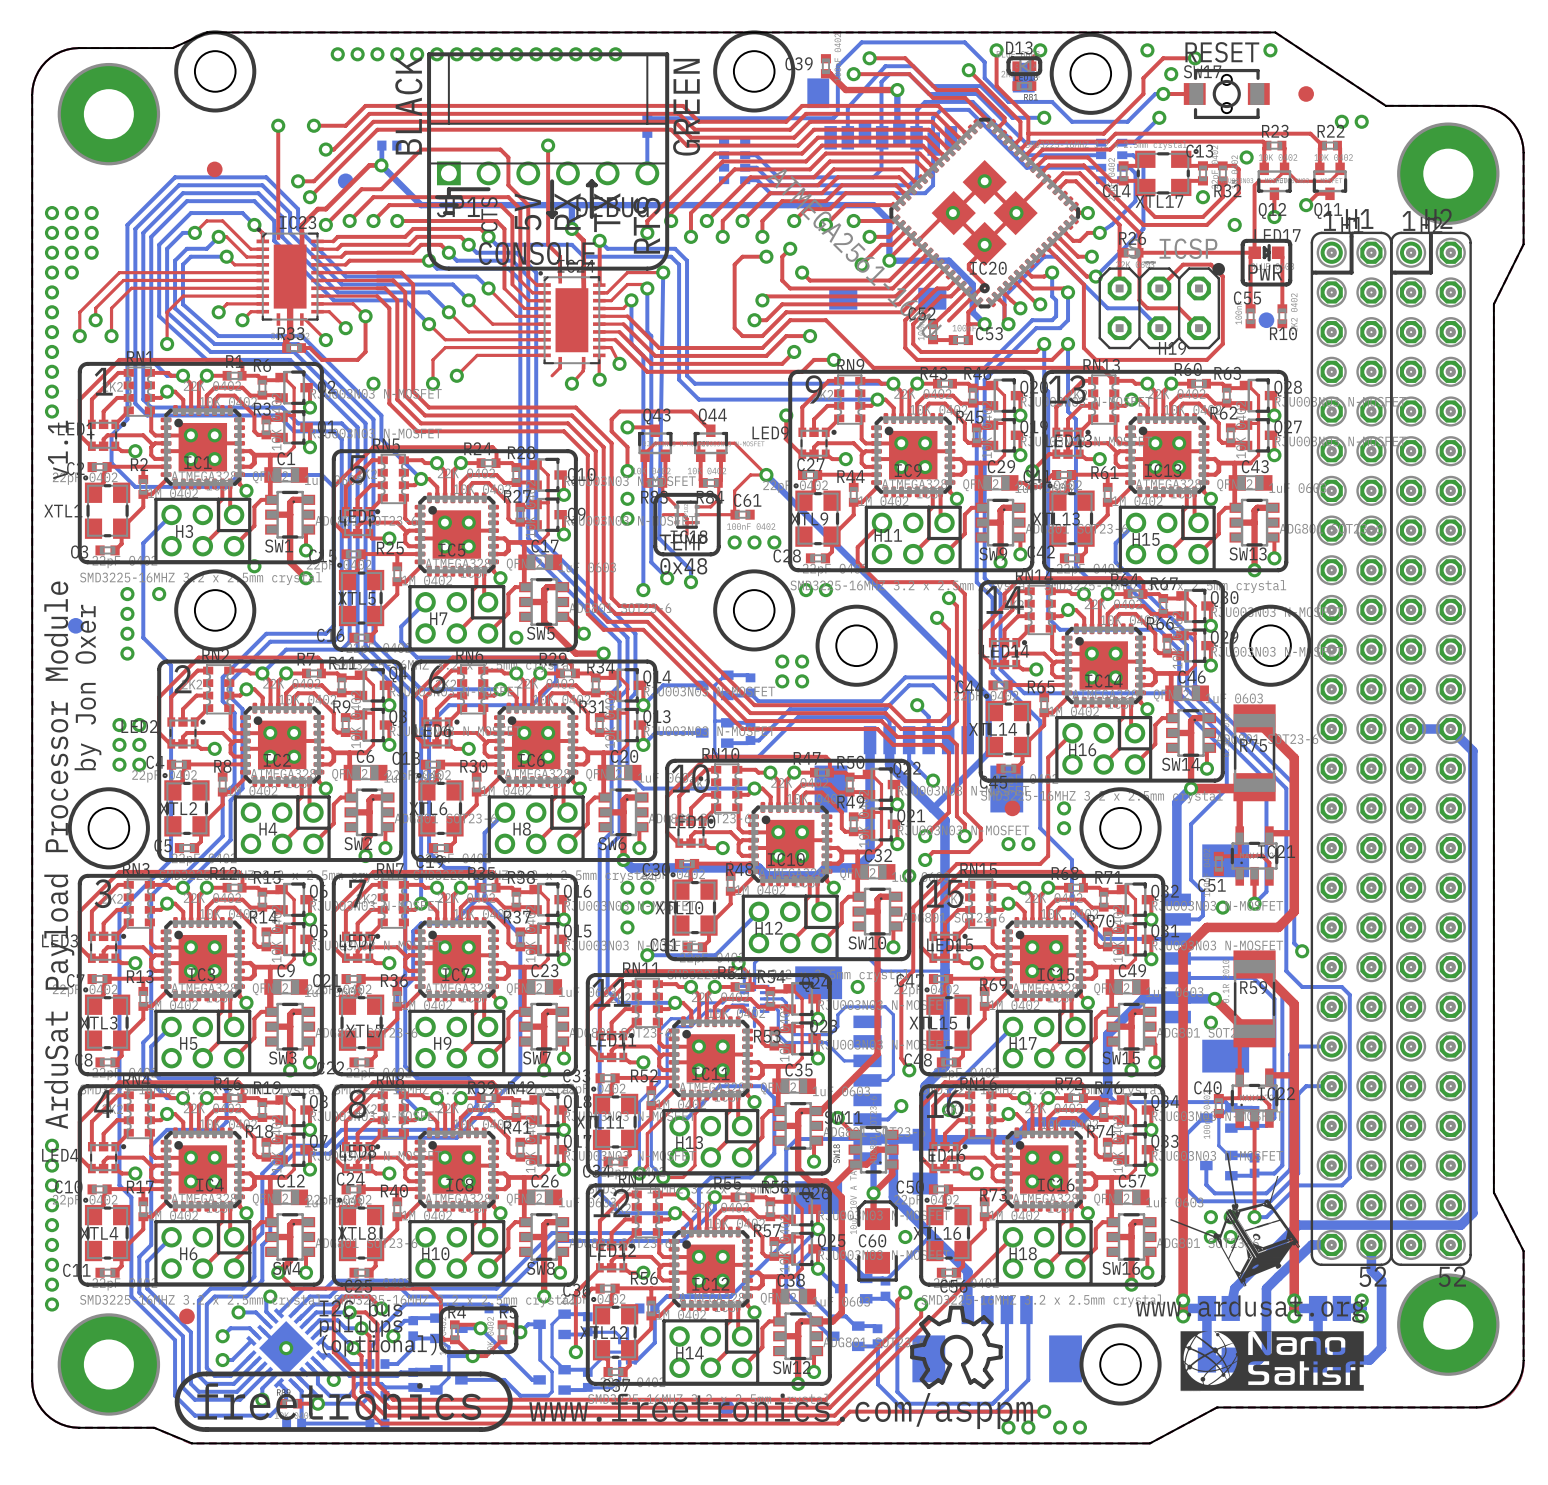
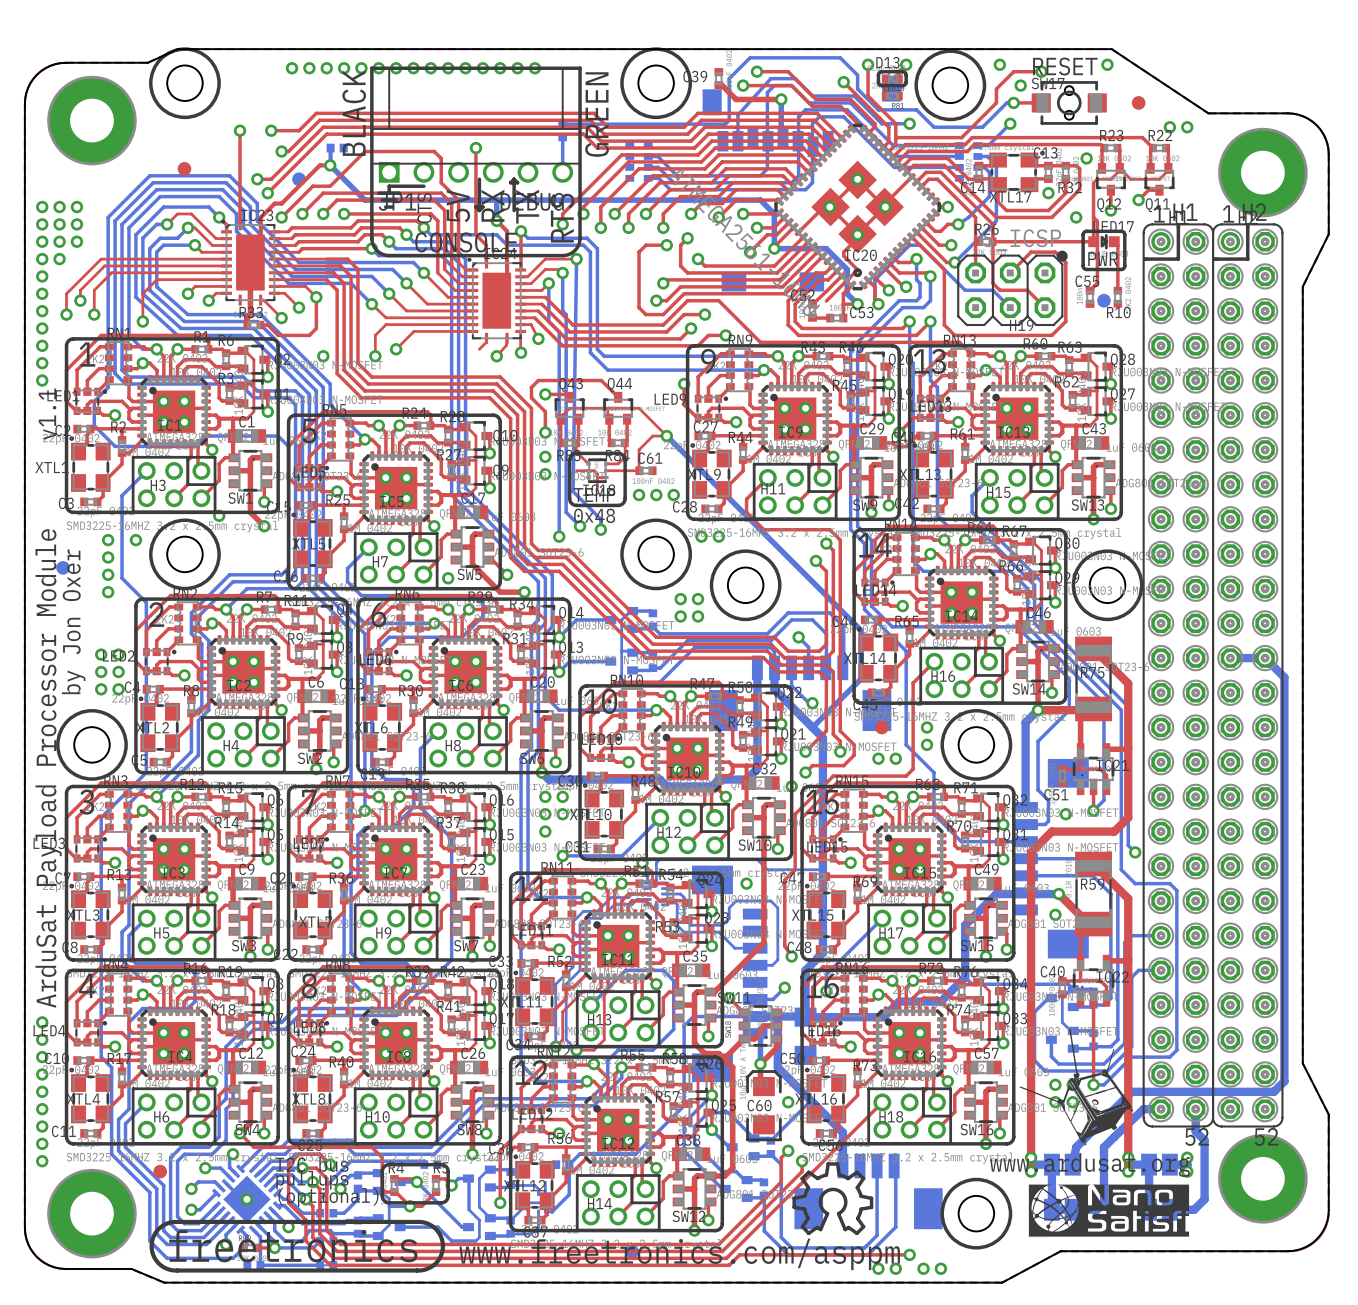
top track: (1254, 252) (1250, 256) (1250, 308) -> (1093, 217) (1097, 221) (1097, 283) (1090, 290)

